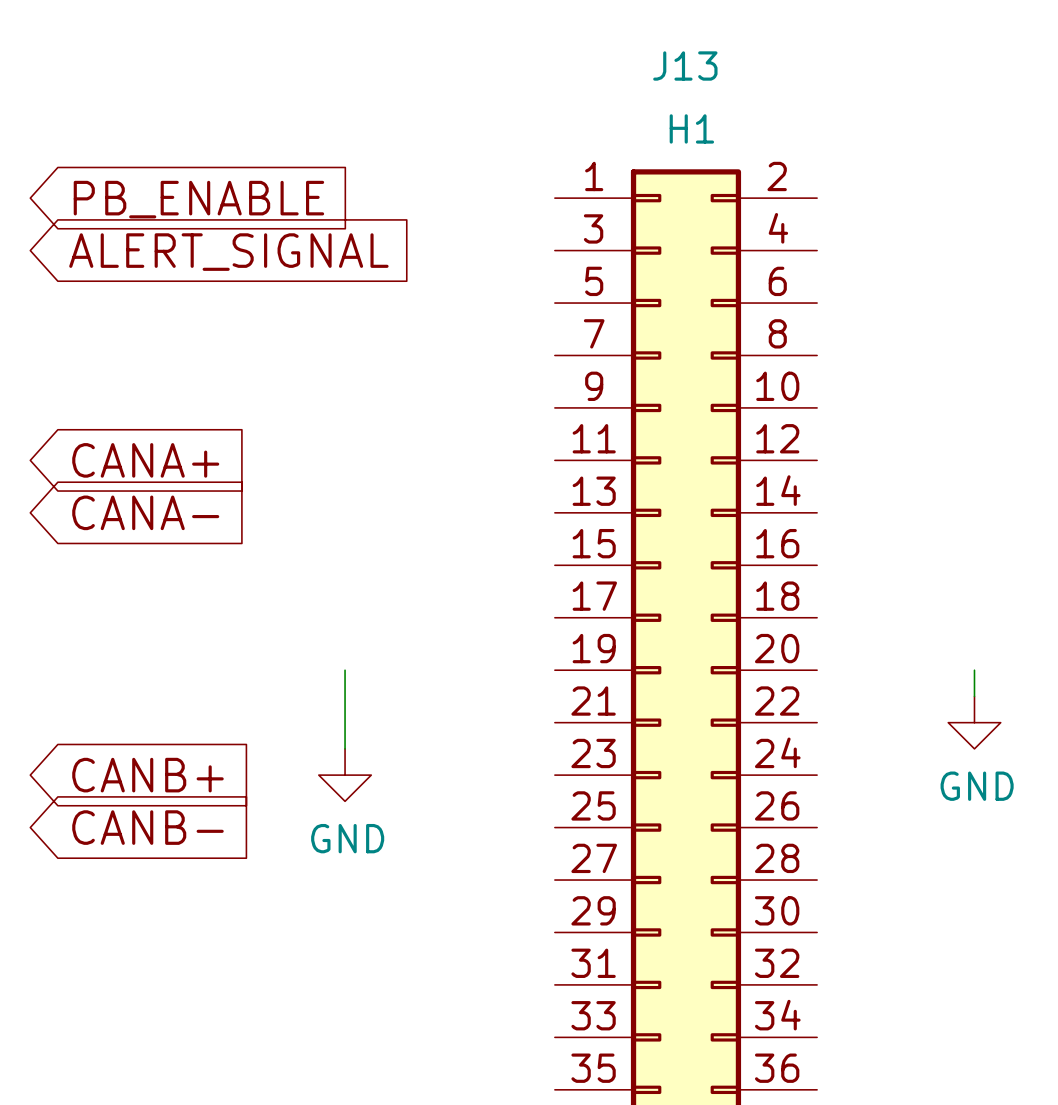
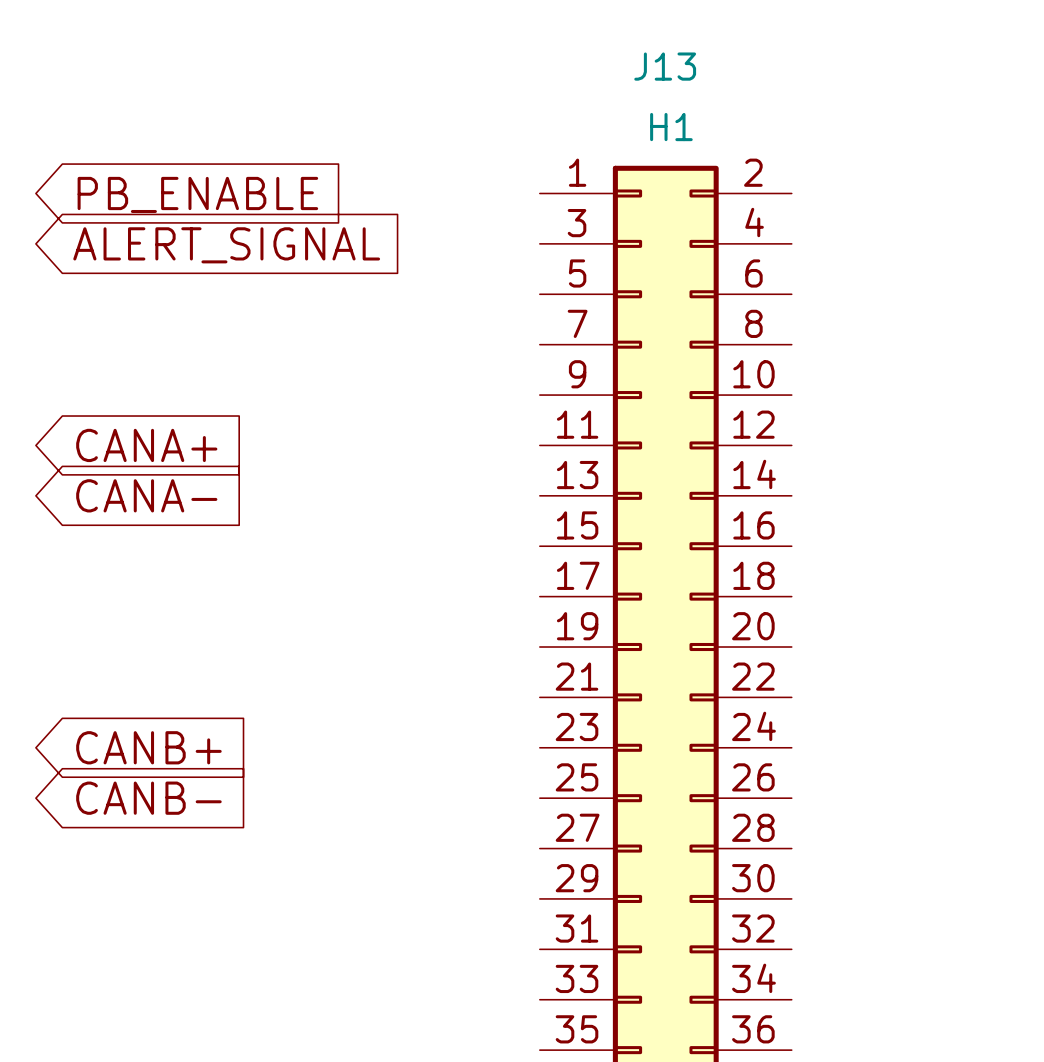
wire: (345, 670) (345, 748) -> none
wire: (974, 670) (974, 696) -> none
power symbol: GND (974, 722) -> none
power symbol: GND (345, 775) -> none

